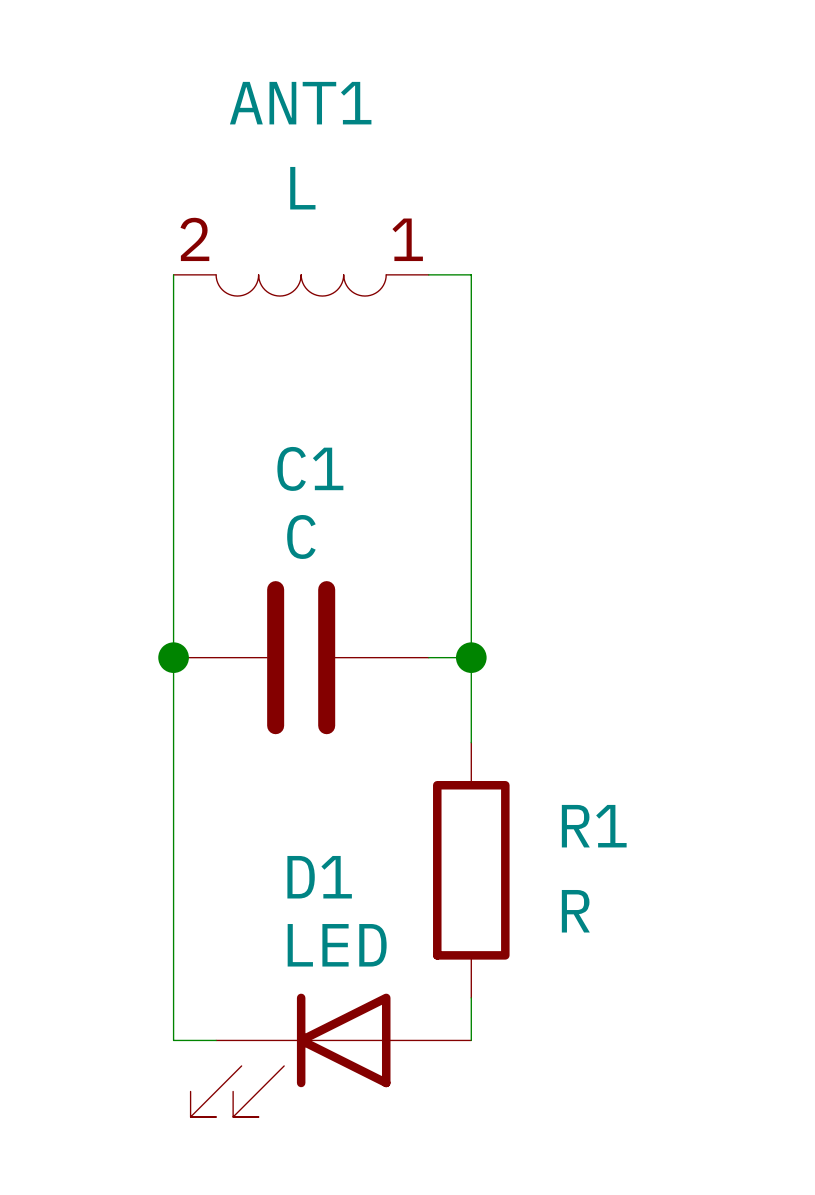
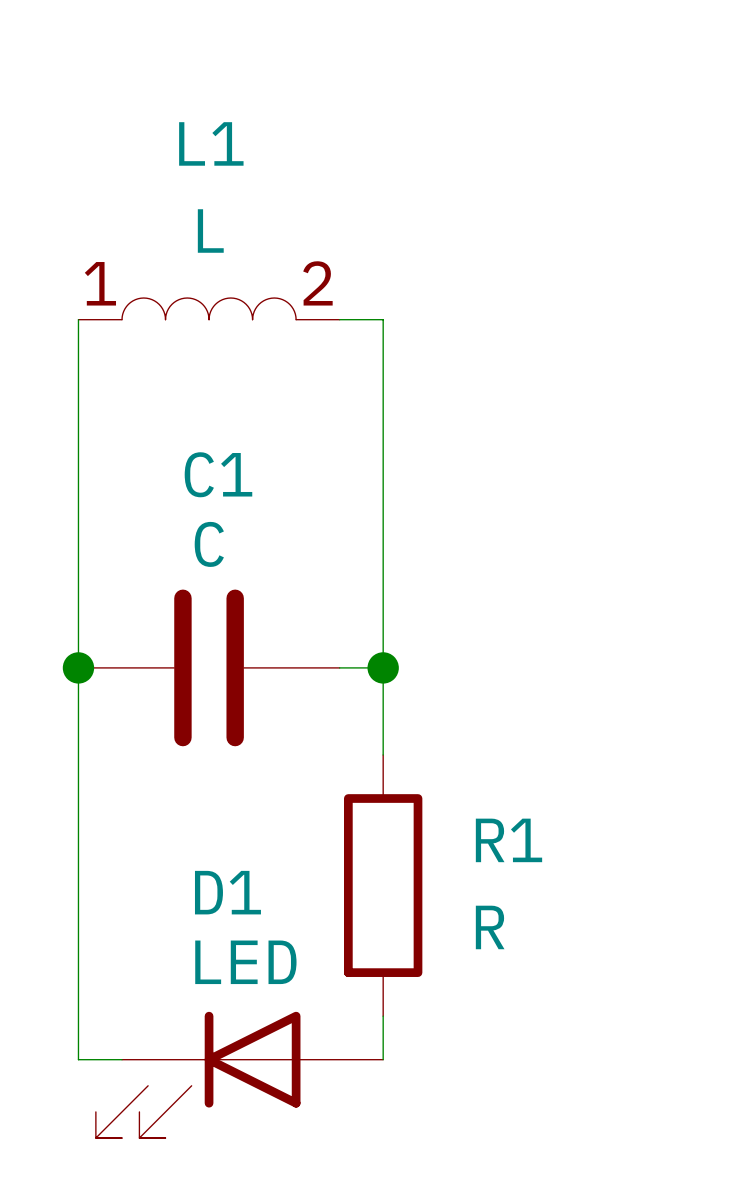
wire: (173, 274) (173, 317) -> none
wire: (428, 274) (471, 274) (471, 317) -> (339, 319) (383, 319)
ANT1: L (301, 285) -> none
L1: none -> L (209, 308)

